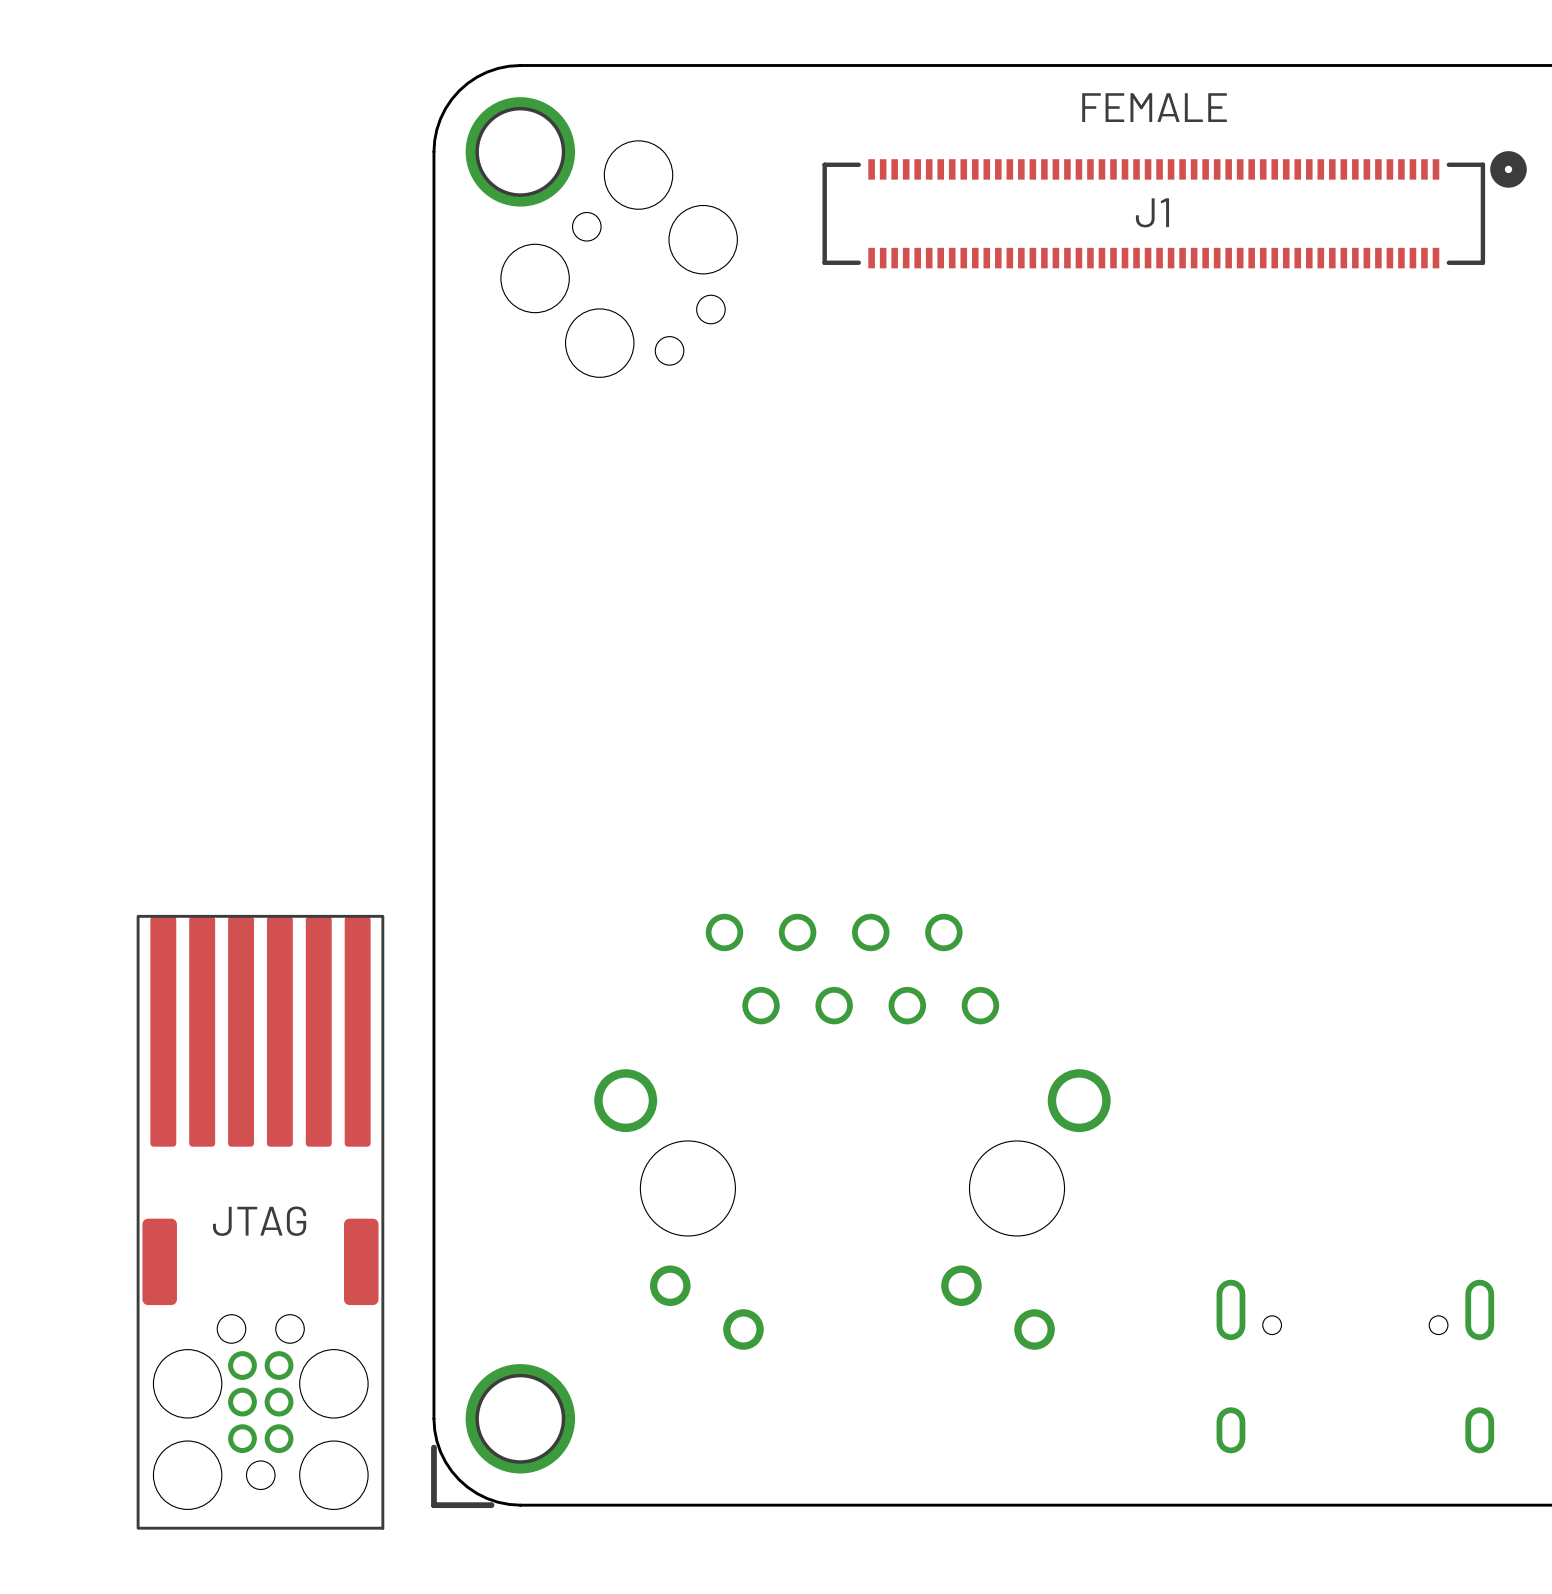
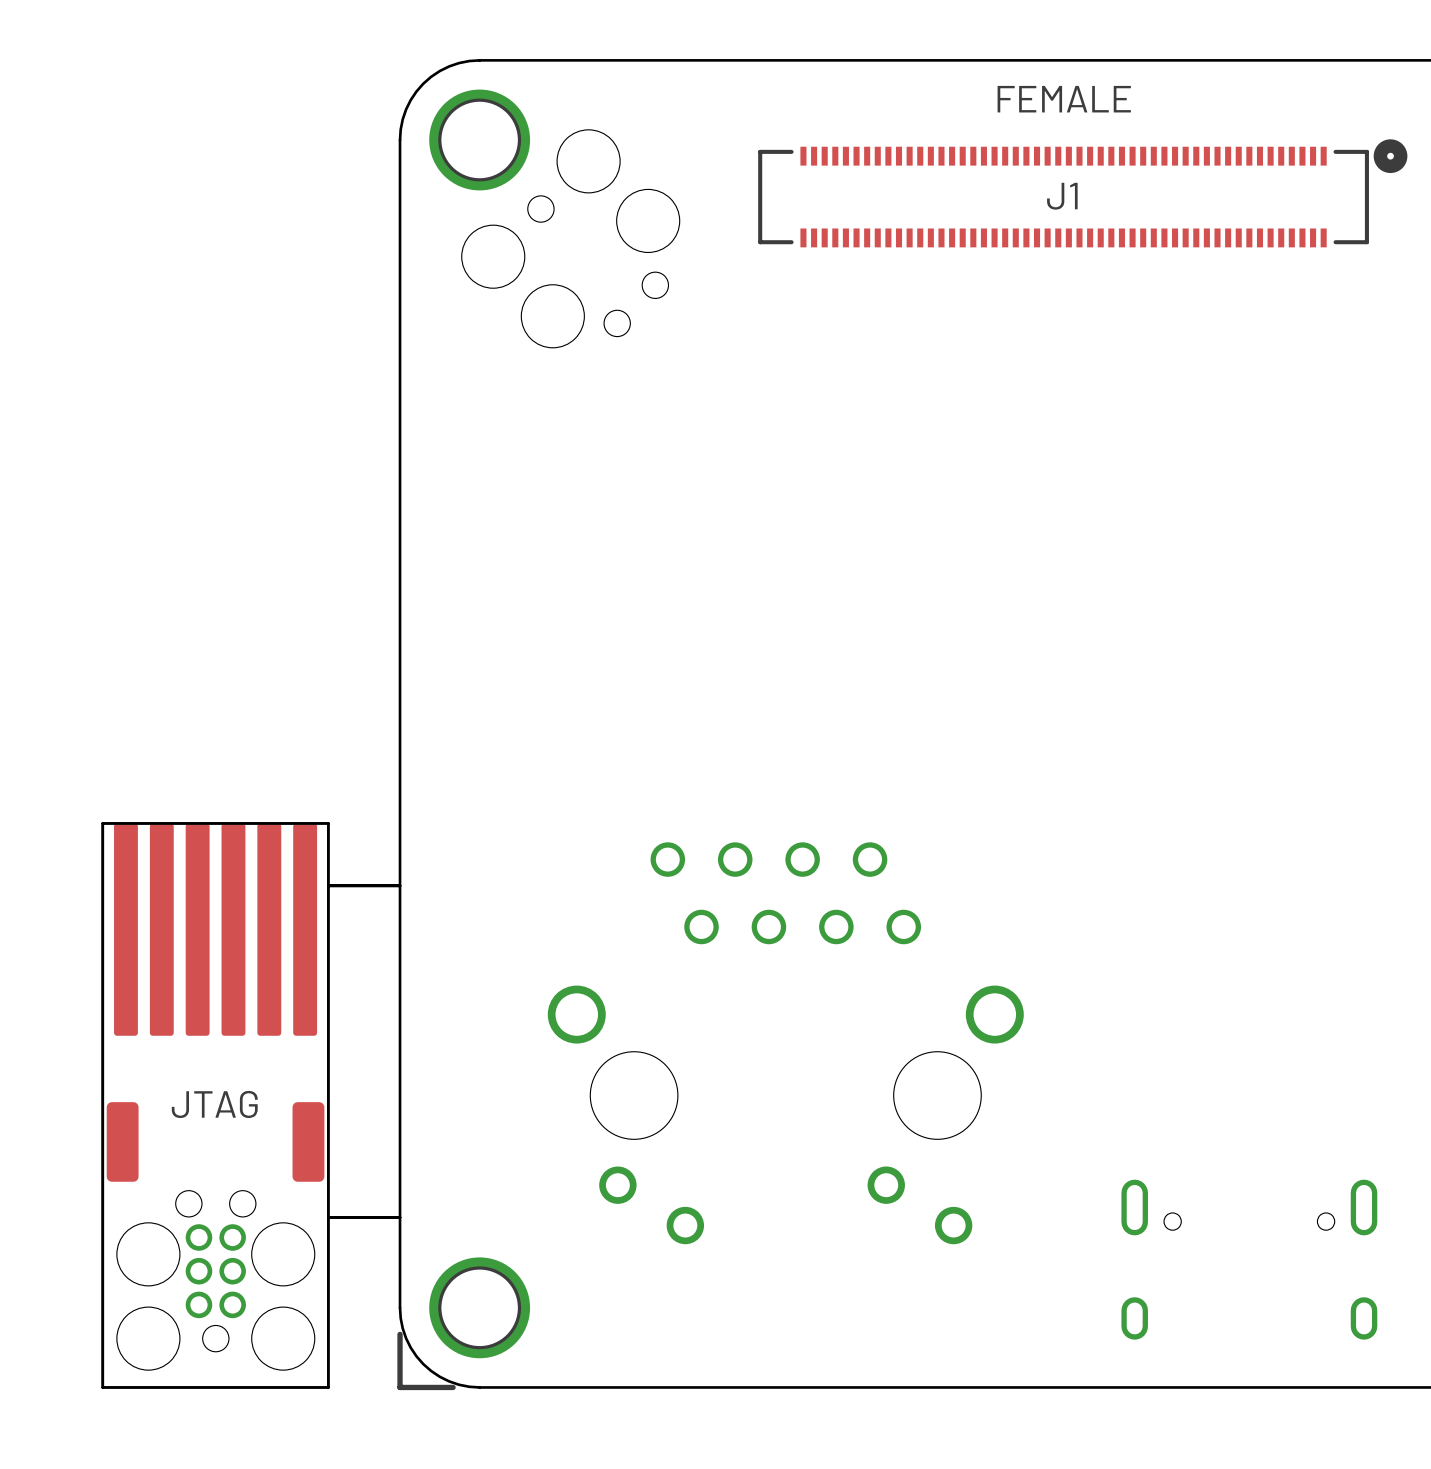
board edge: none -> (102, 823) (328, 823) (328, 1387) (102, 1387) (102, 823)
board edge: none -> (328, 885) (400, 885)
JTAG position: (260, 1222) -> (215, 1105)
board edge: none -> (328, 1217) (400, 1217)

